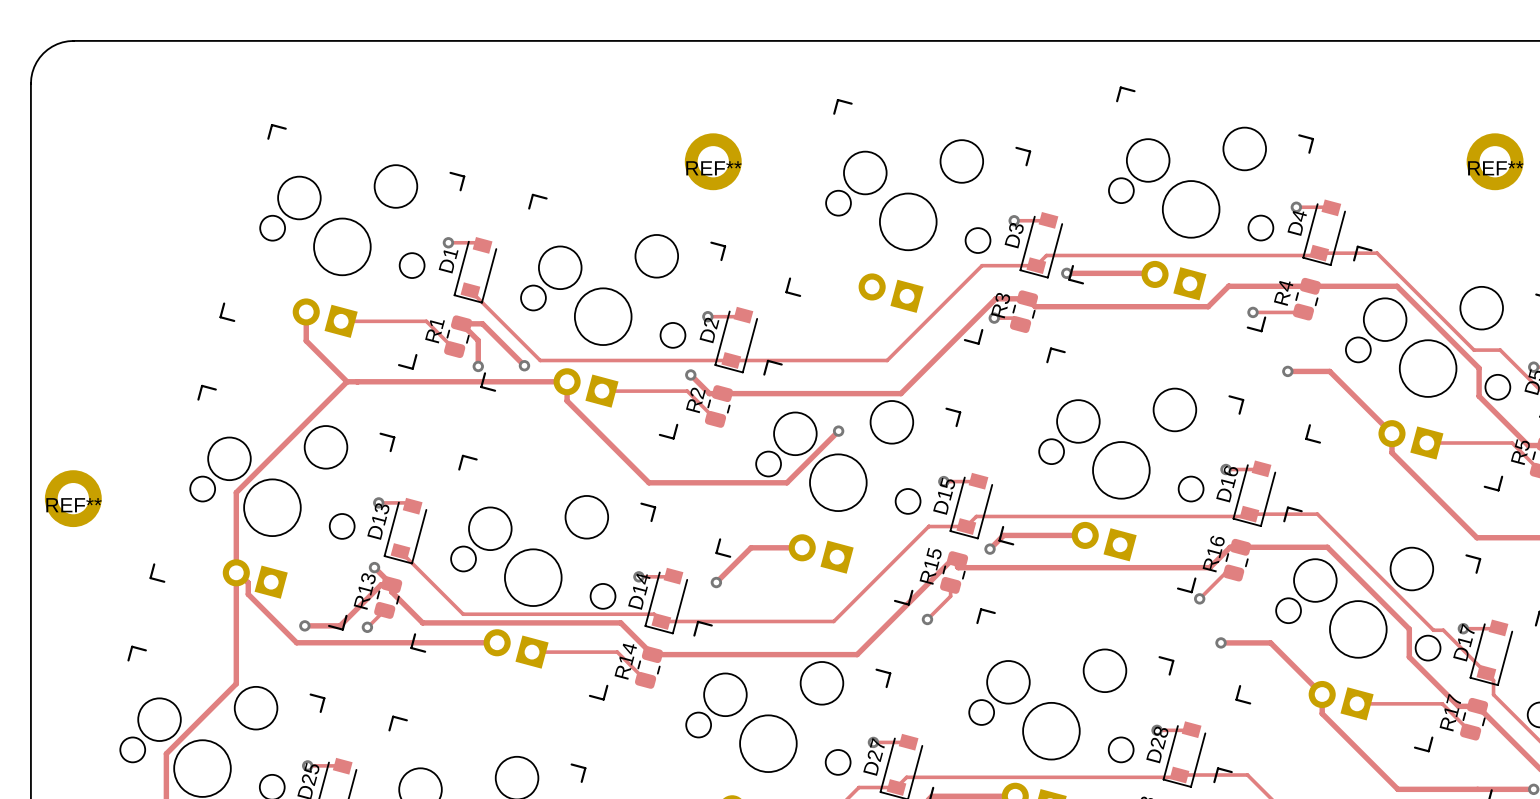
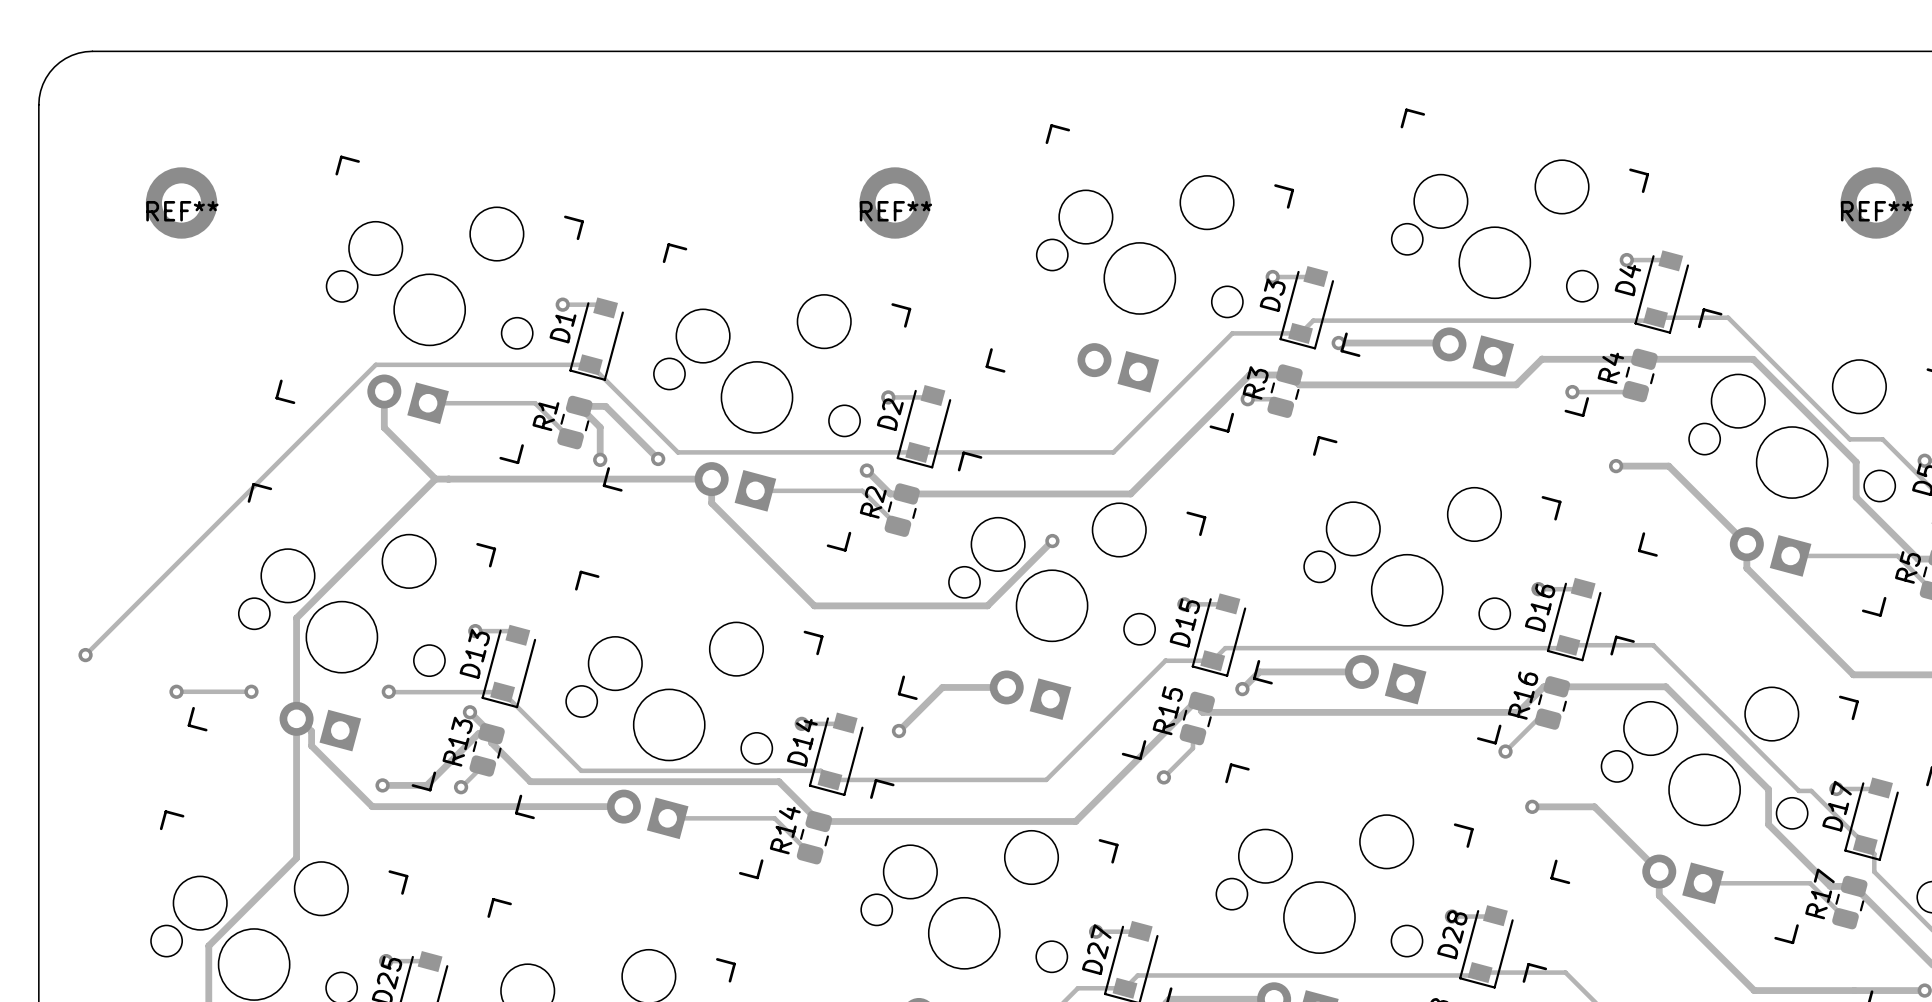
track: none -> (590, 364) (375, 364) (85, 655)
REF** position: (73, 498) -> (181, 202)
via: none -> (85, 655)
track: none -> (176, 691) (251, 691)
via: none -> (176, 691)
via: none -> (251, 691)
track: none -> (388, 691) (502, 692)
via: none -> (388, 691)

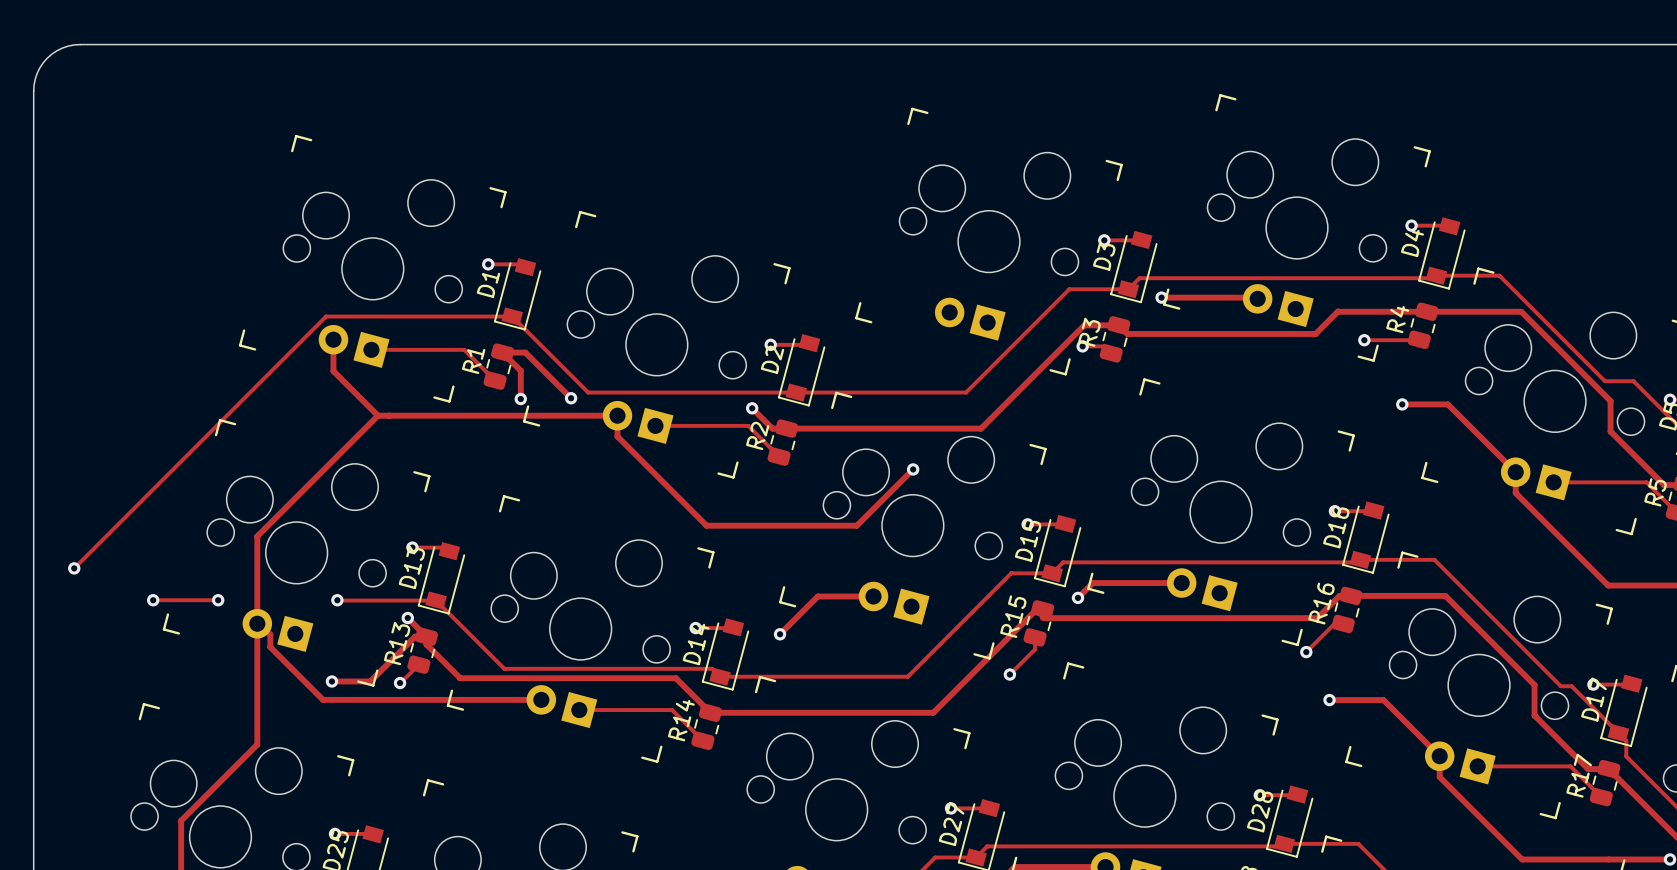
REF**: (181, 202) -> none
REF**: (895, 202) -> none
REF**: (1876, 202) -> none

